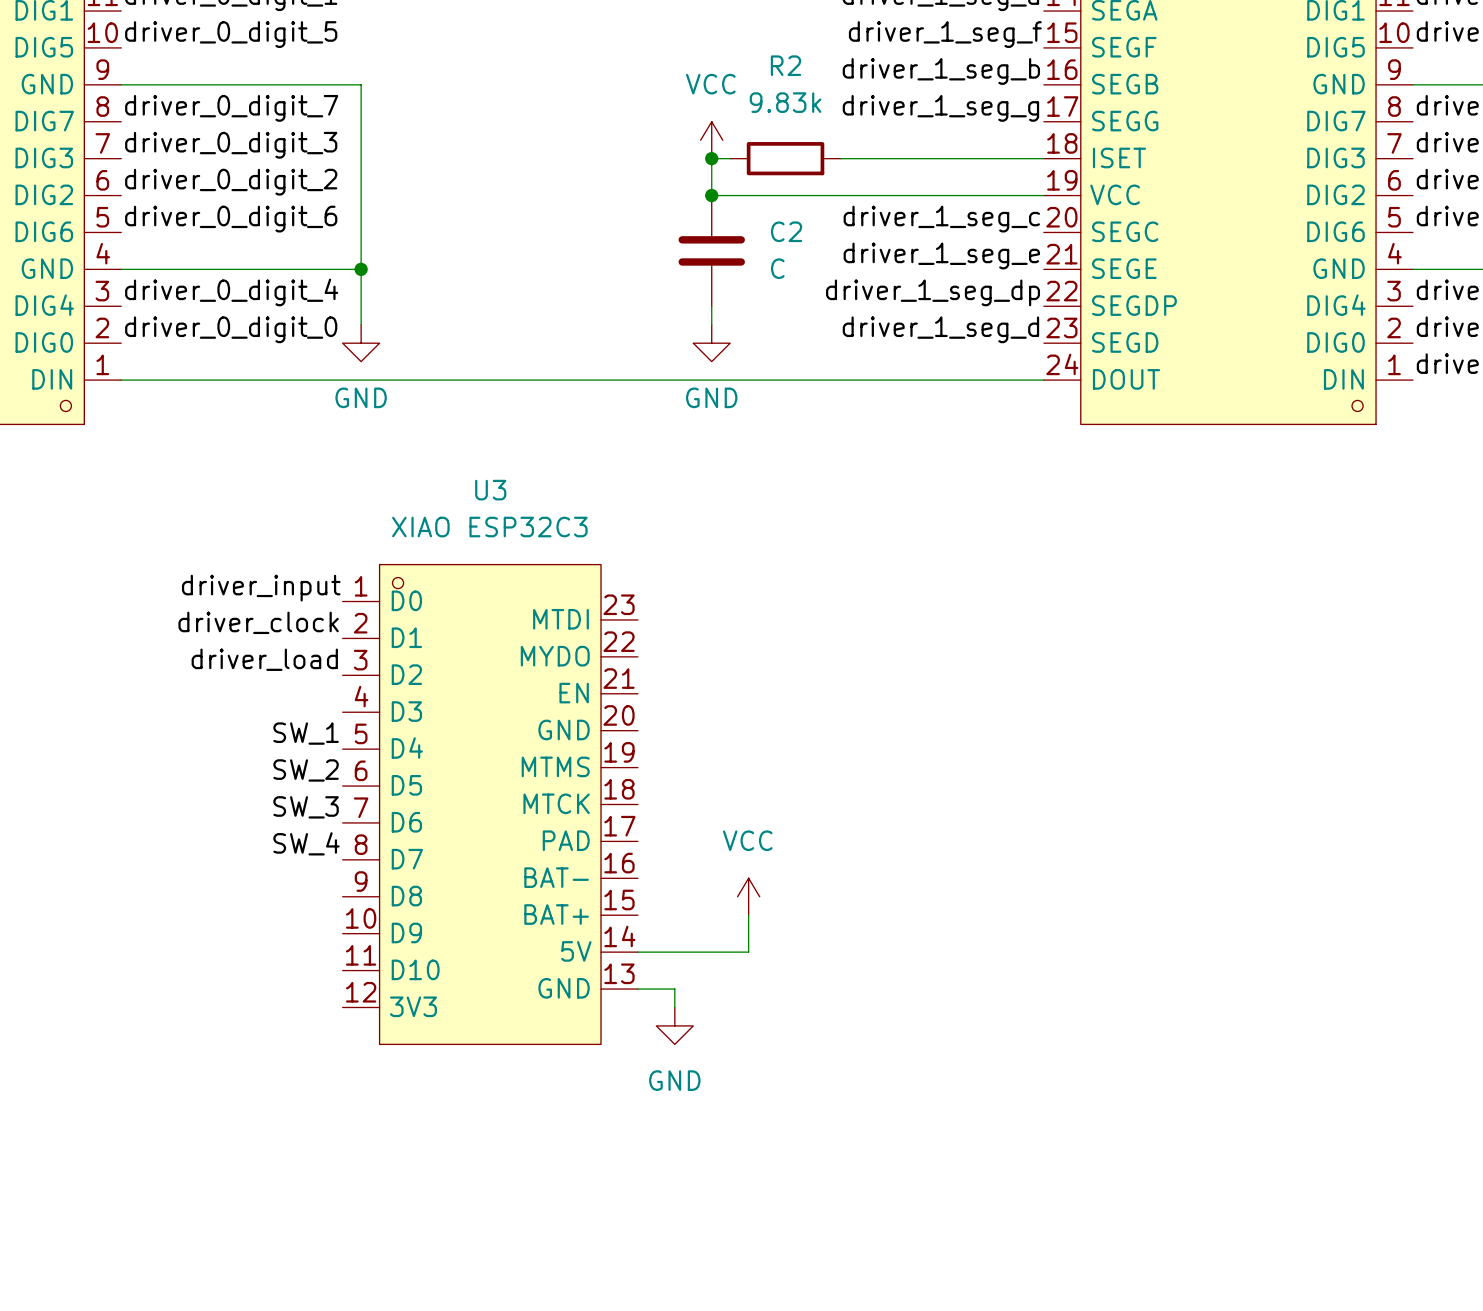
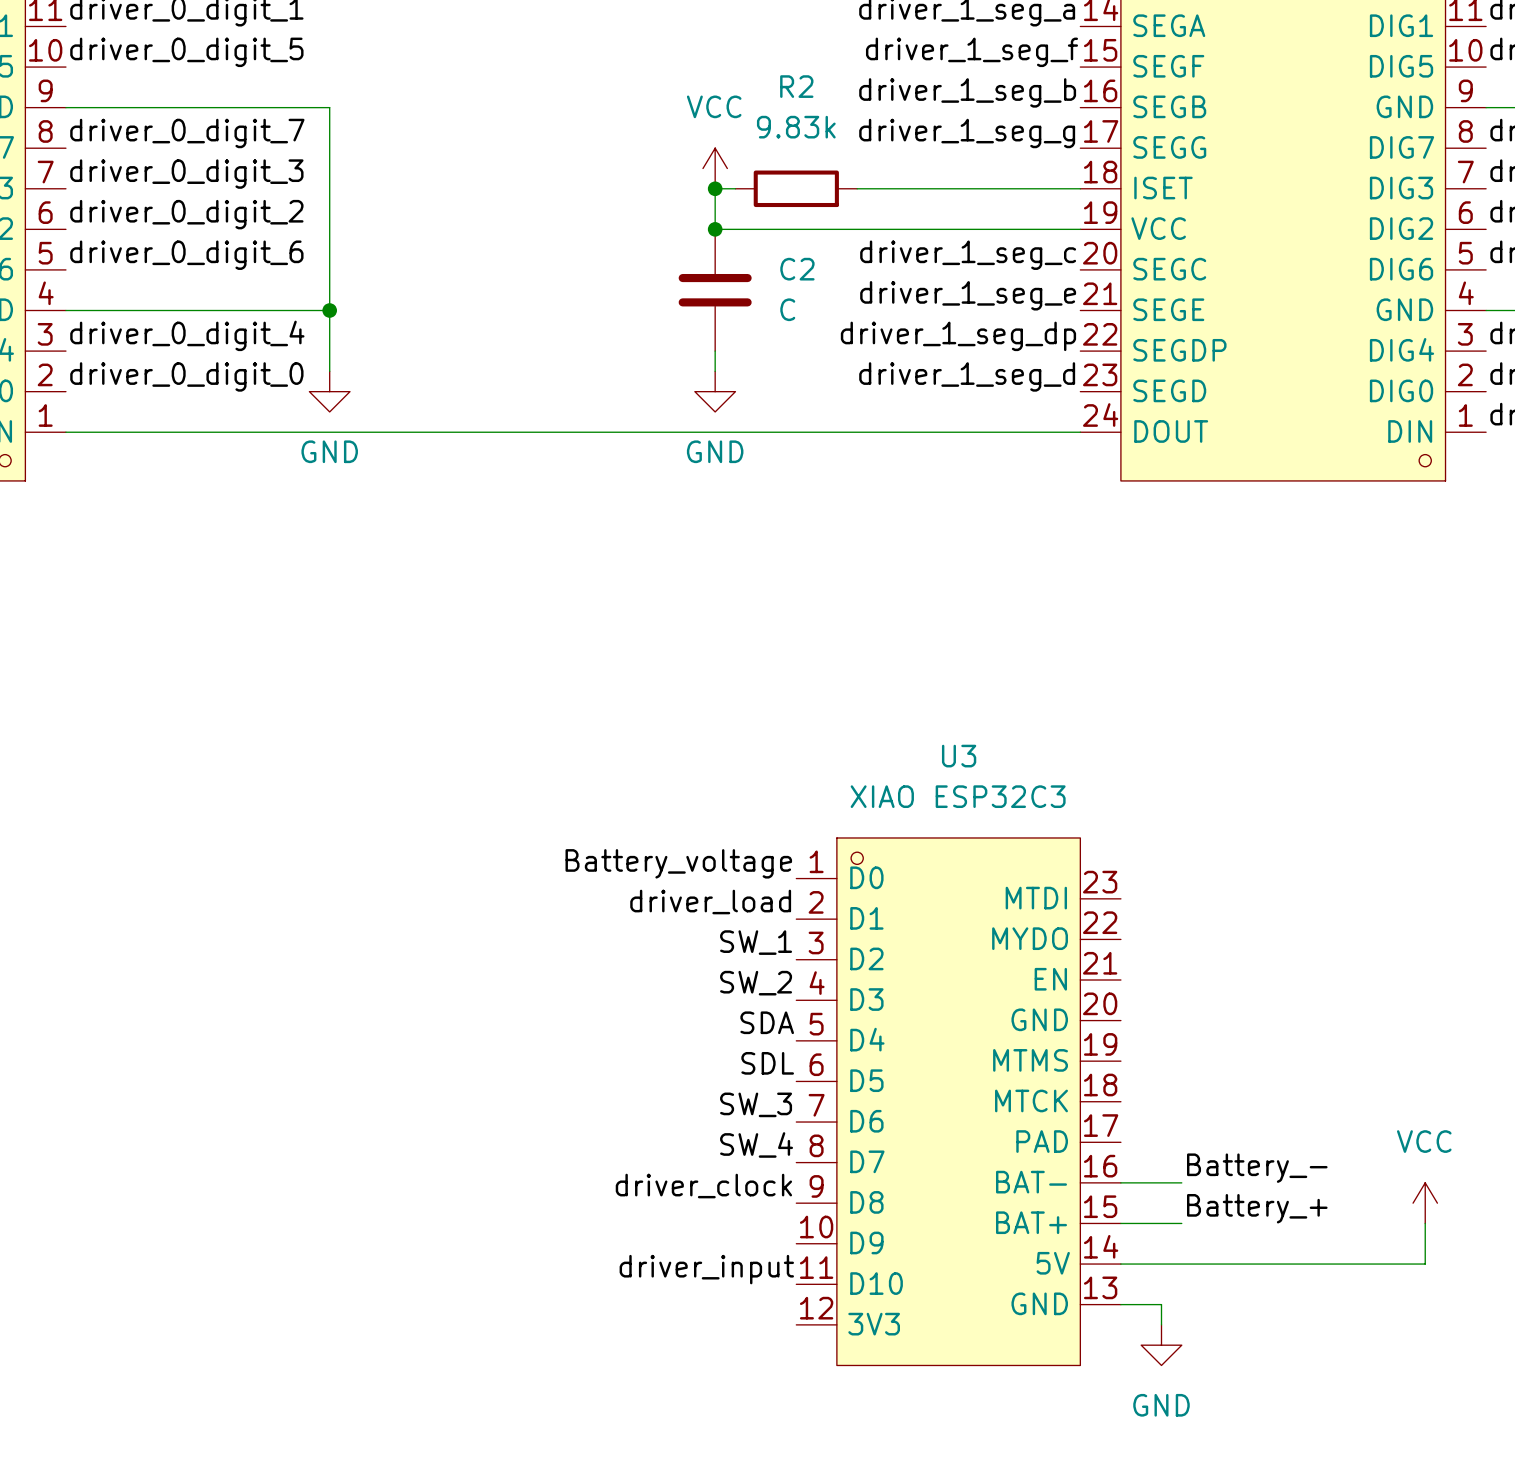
label: driver_input (261, 588) -> none
label: driver_clock (258, 622) -> none
label: driver_load (264, 659) -> none
label: SW_1 (306, 733) -> none
label: SW_2 (306, 770) -> none
label: none -> Battery_voltage (678, 863)
U3 position: (490, 804) -> (958, 1101)
label: SW_3 (306, 807) -> none
label: none -> driver_load (710, 902)
label: SW_4 (306, 843) -> none
label: none -> SW_1 (756, 942)
label: none -> SW_2 (756, 983)
power symbol: VCC (748, 896) -> none
wire: (748, 915) (748, 952) (637, 952) -> none
label: none -> SDA (767, 1022)
label: none -> SDL (767, 1063)
wire: (637, 989) (674, 989) (674, 1007) -> none
label: none -> SW_3 (756, 1104)
power symbol: GND (674, 1025) -> none
label: none -> SW_4 (756, 1144)
label: none -> Battery_- (1257, 1168)
wire: none -> (1120, 1182) (1181, 1182)
label: none -> driver_clock (703, 1186)
power symbol: none -> VCC (1425, 1203)
label: none -> Battery_+ (1257, 1208)
wire: none -> (1120, 1223) (1181, 1223)
wire: none -> (1425, 1223) (1425, 1264) (1120, 1264)
label: none -> driver_input (706, 1269)
wire: none -> (1120, 1304) (1161, 1304) (1161, 1324)
power symbol: none -> GND (1161, 1345)

